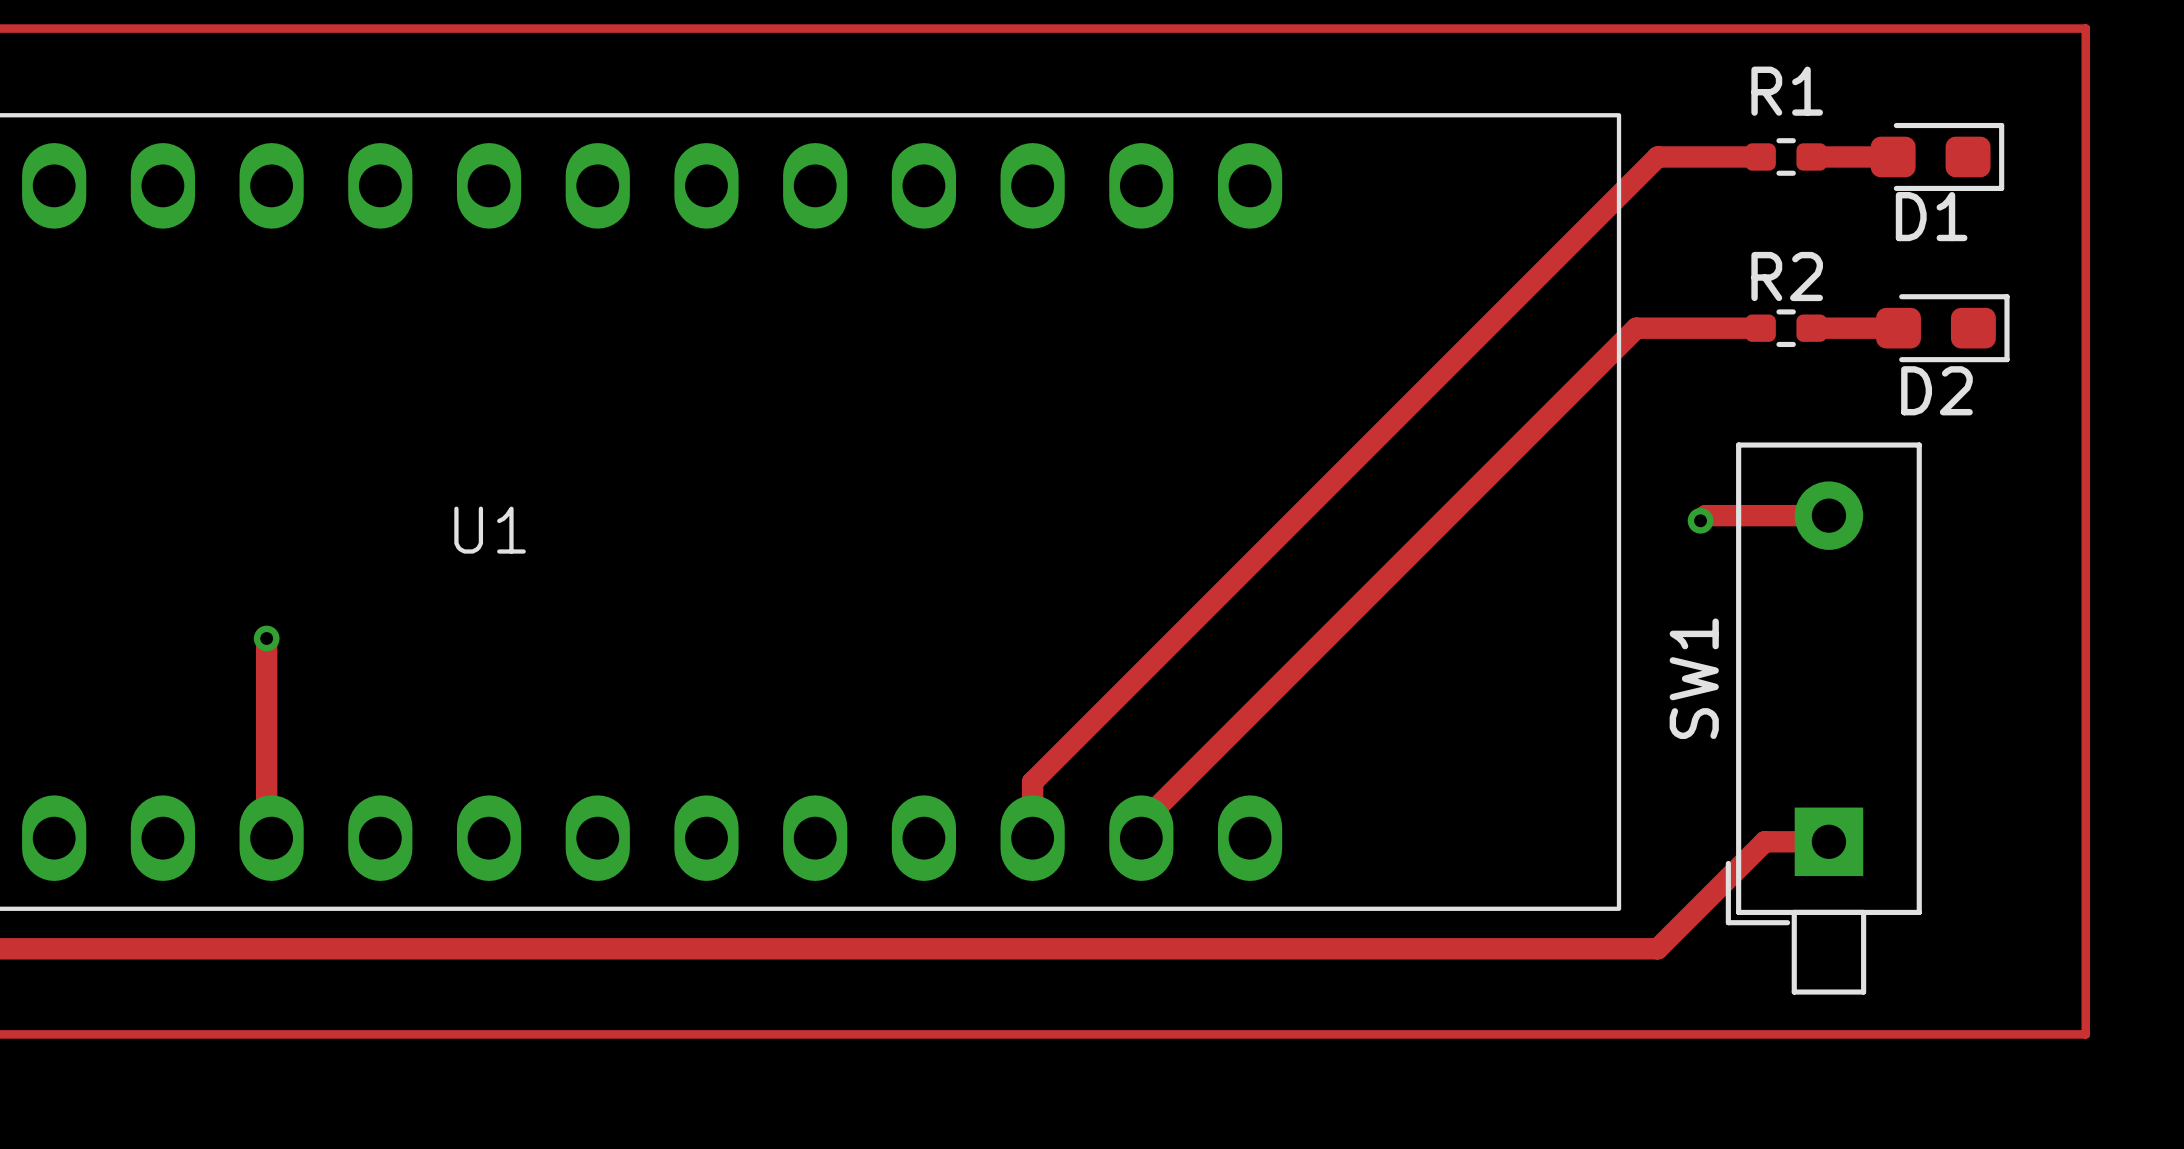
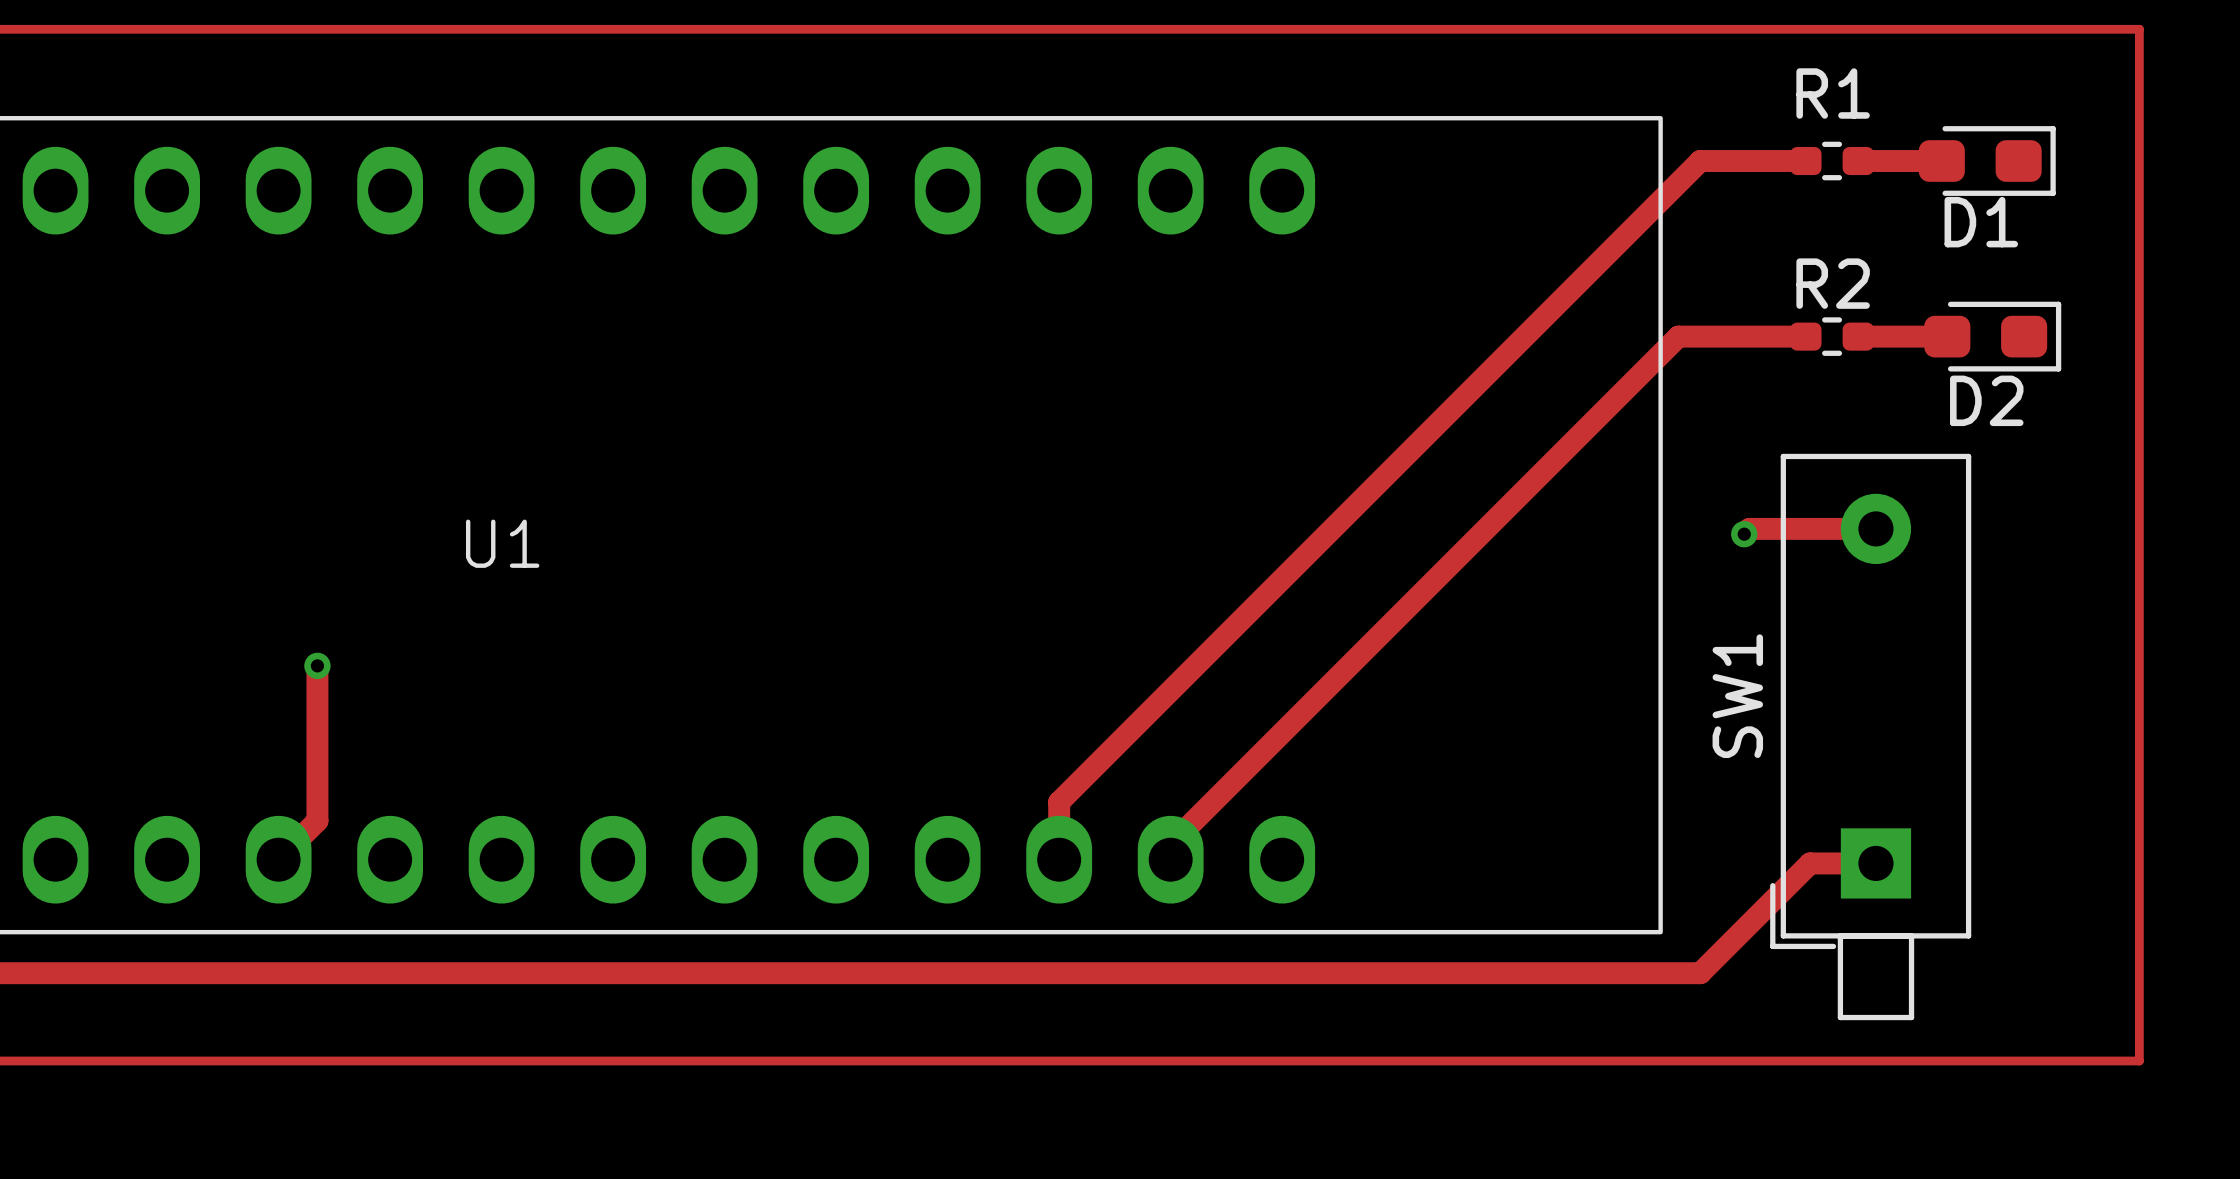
track: (266, 638) (266, 833) (271, 838) -> (317, 665) (317, 820) (278, 859)
via position: (266, 638) -> (317, 665)

